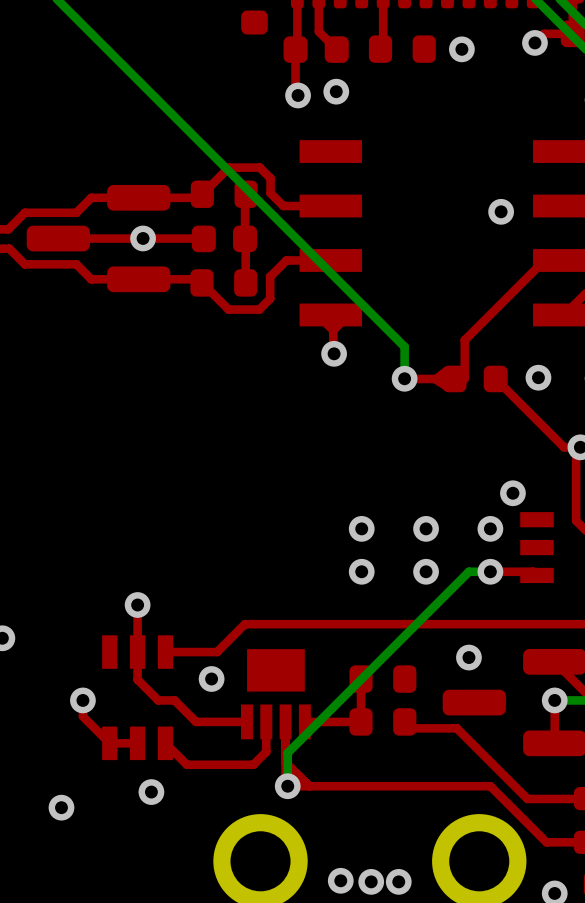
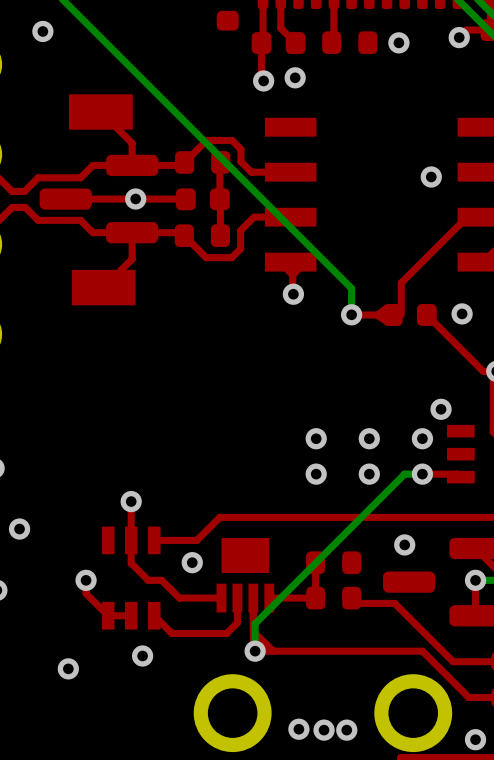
via: none -> (42, 31)
top track: none -> (100, 112) (132, 143) (132, 165)
part: none -> (100, 112)
top track: none -> (132, 232) (132, 259) (103, 287)
part: none -> (103, 287)

